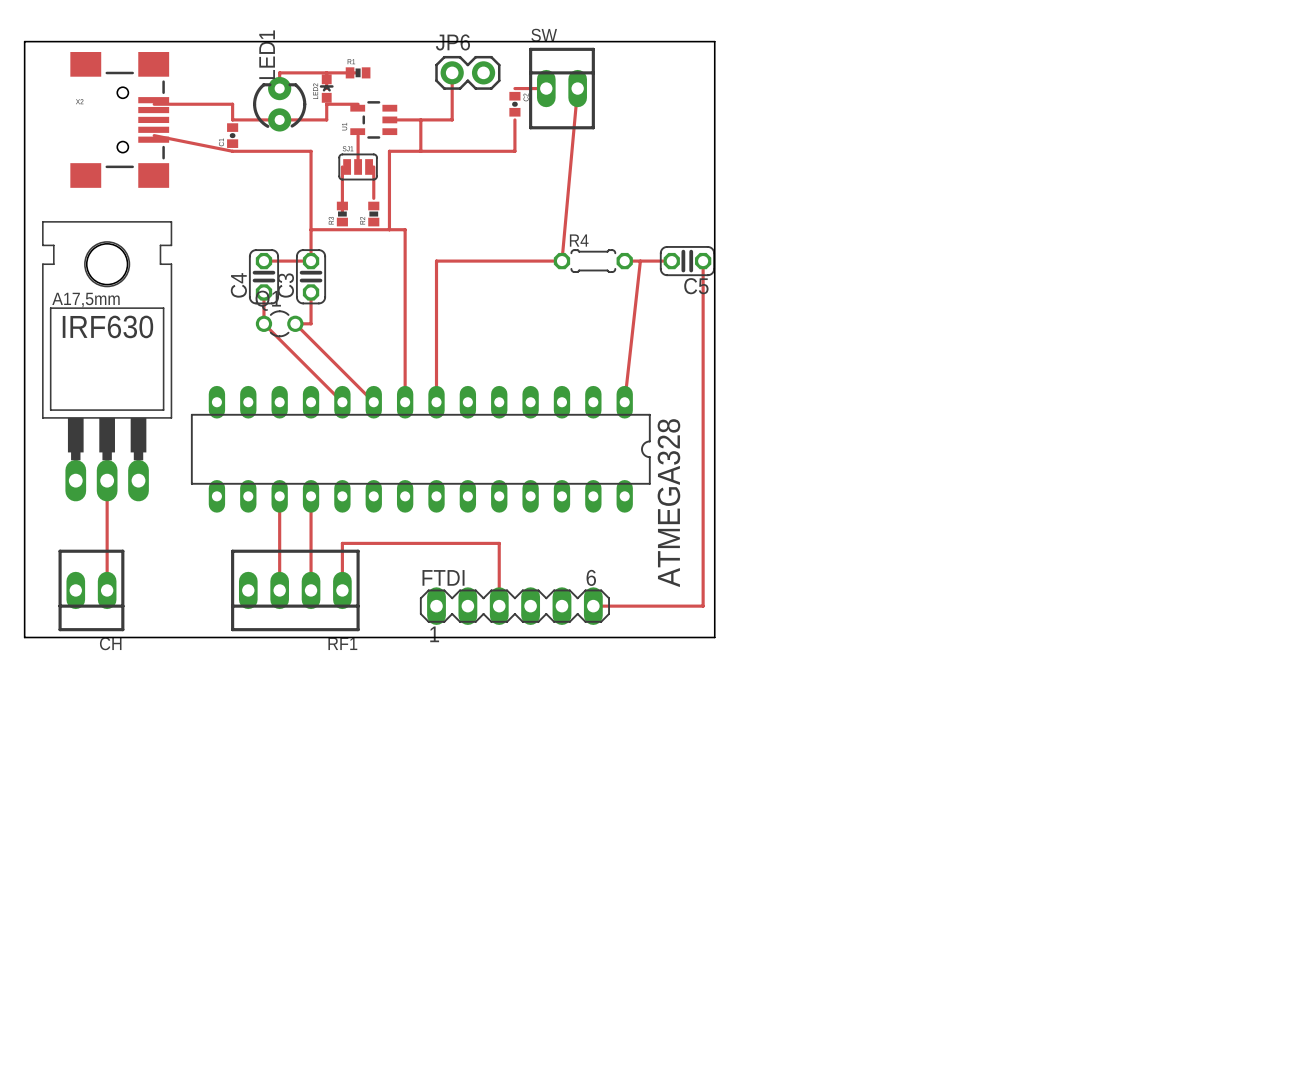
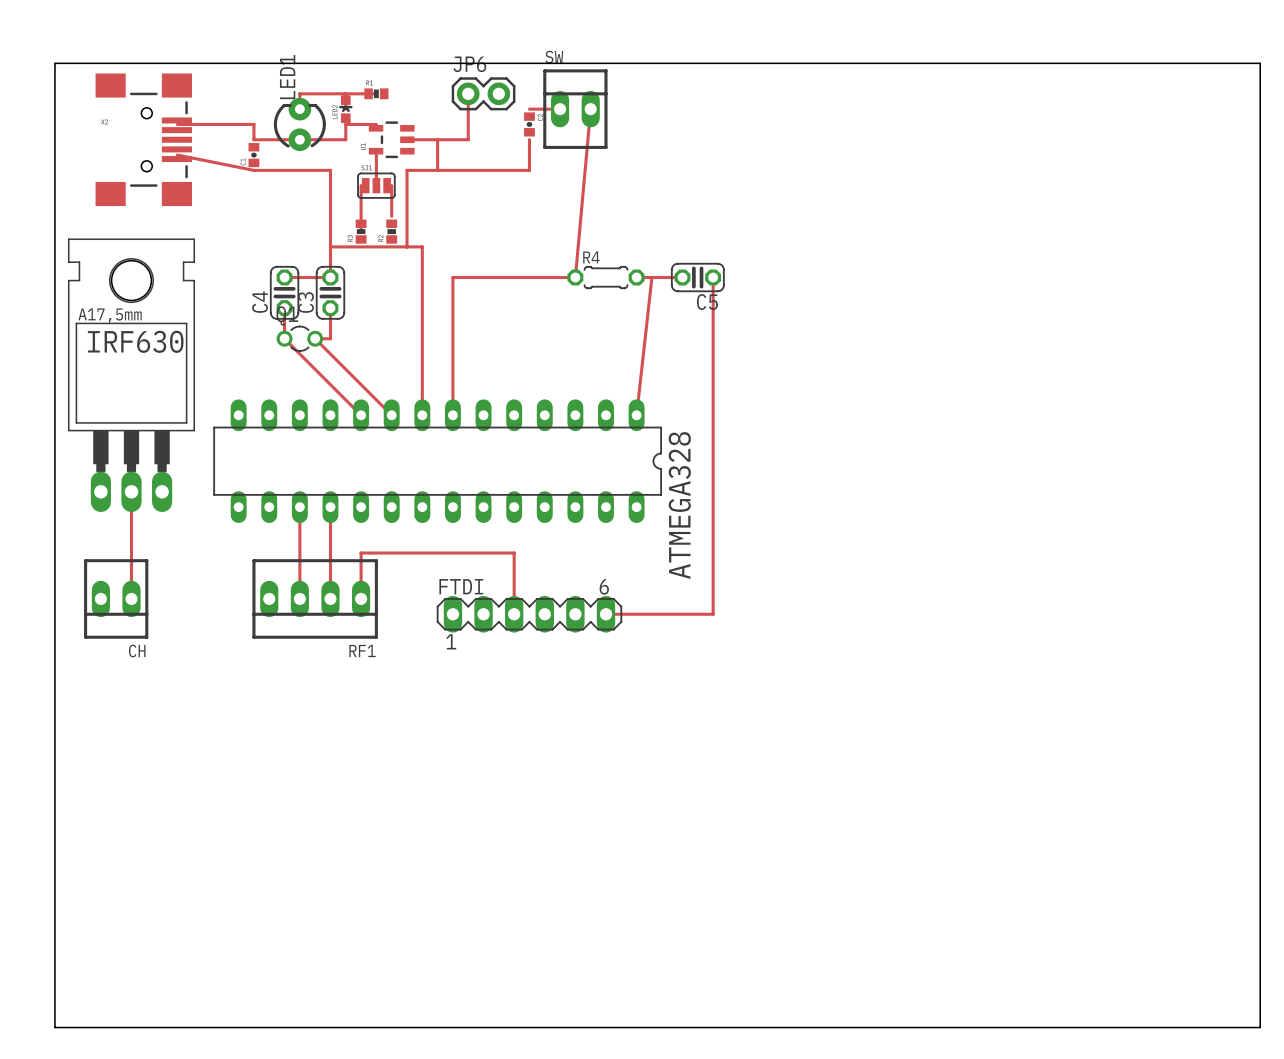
board edge: (28, 41) (24, 41) (24, 637) (714, 637) (714, 41) -> (54, 63) (54, 1027) (1260, 1027) (1260, 63) (724, 63)

